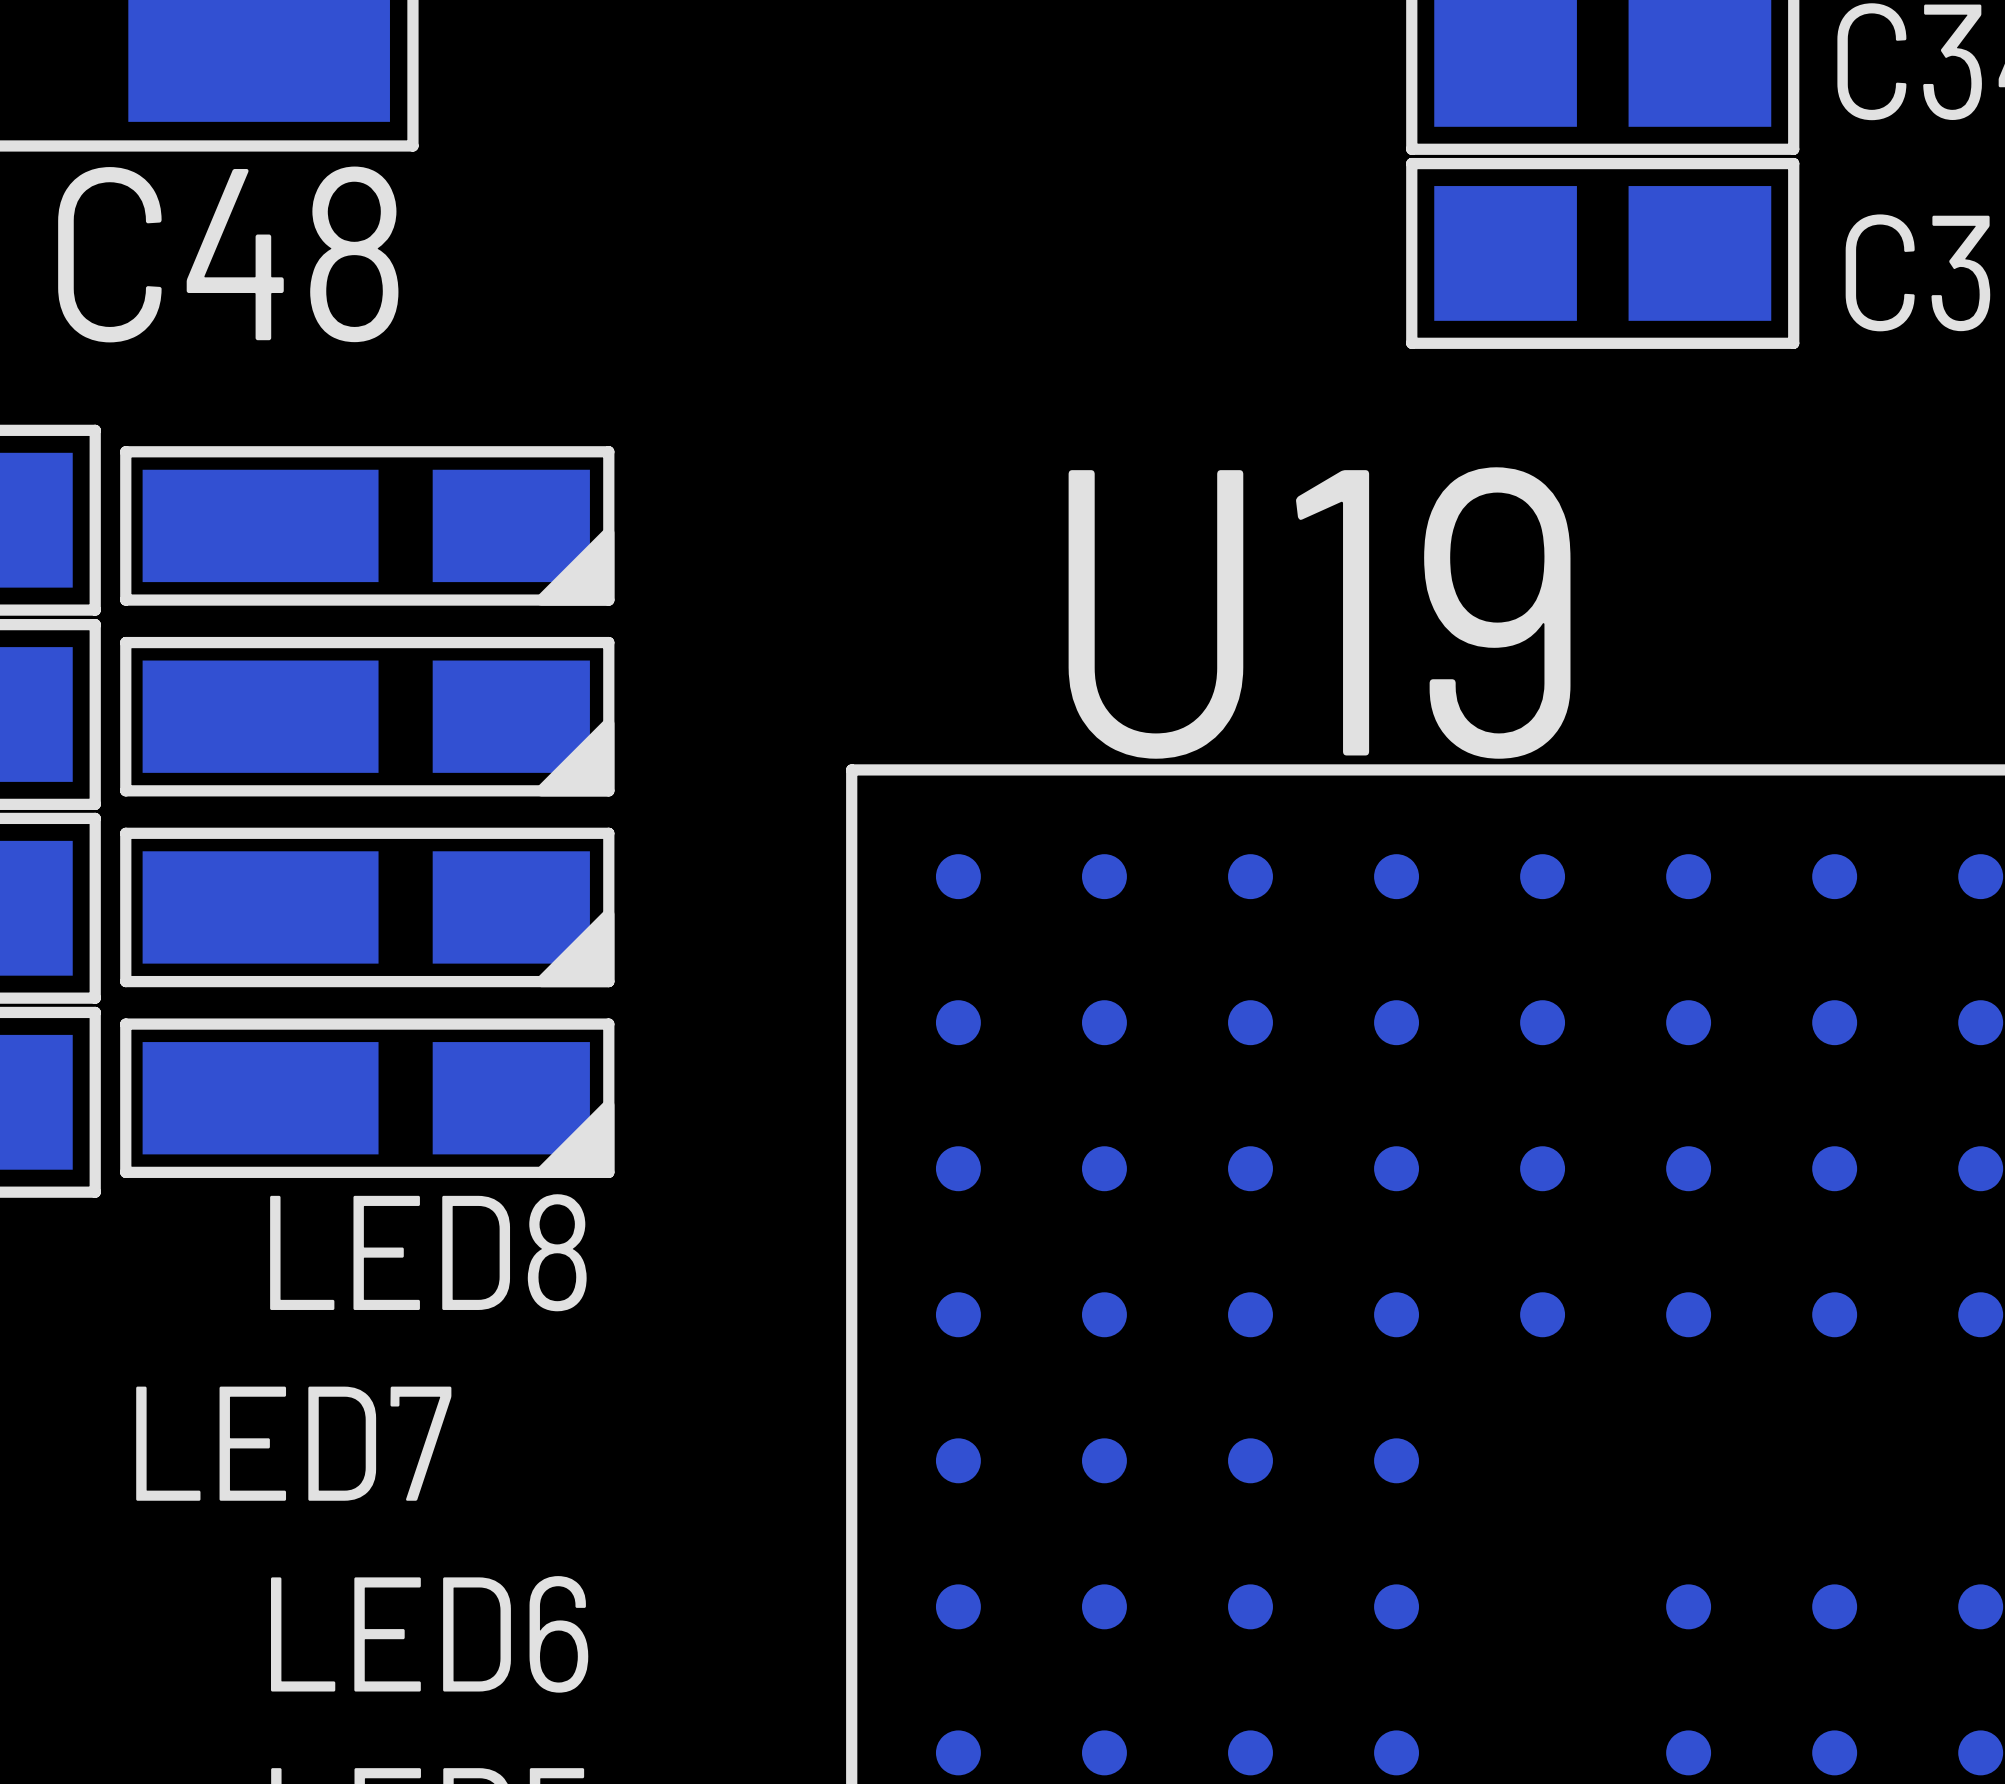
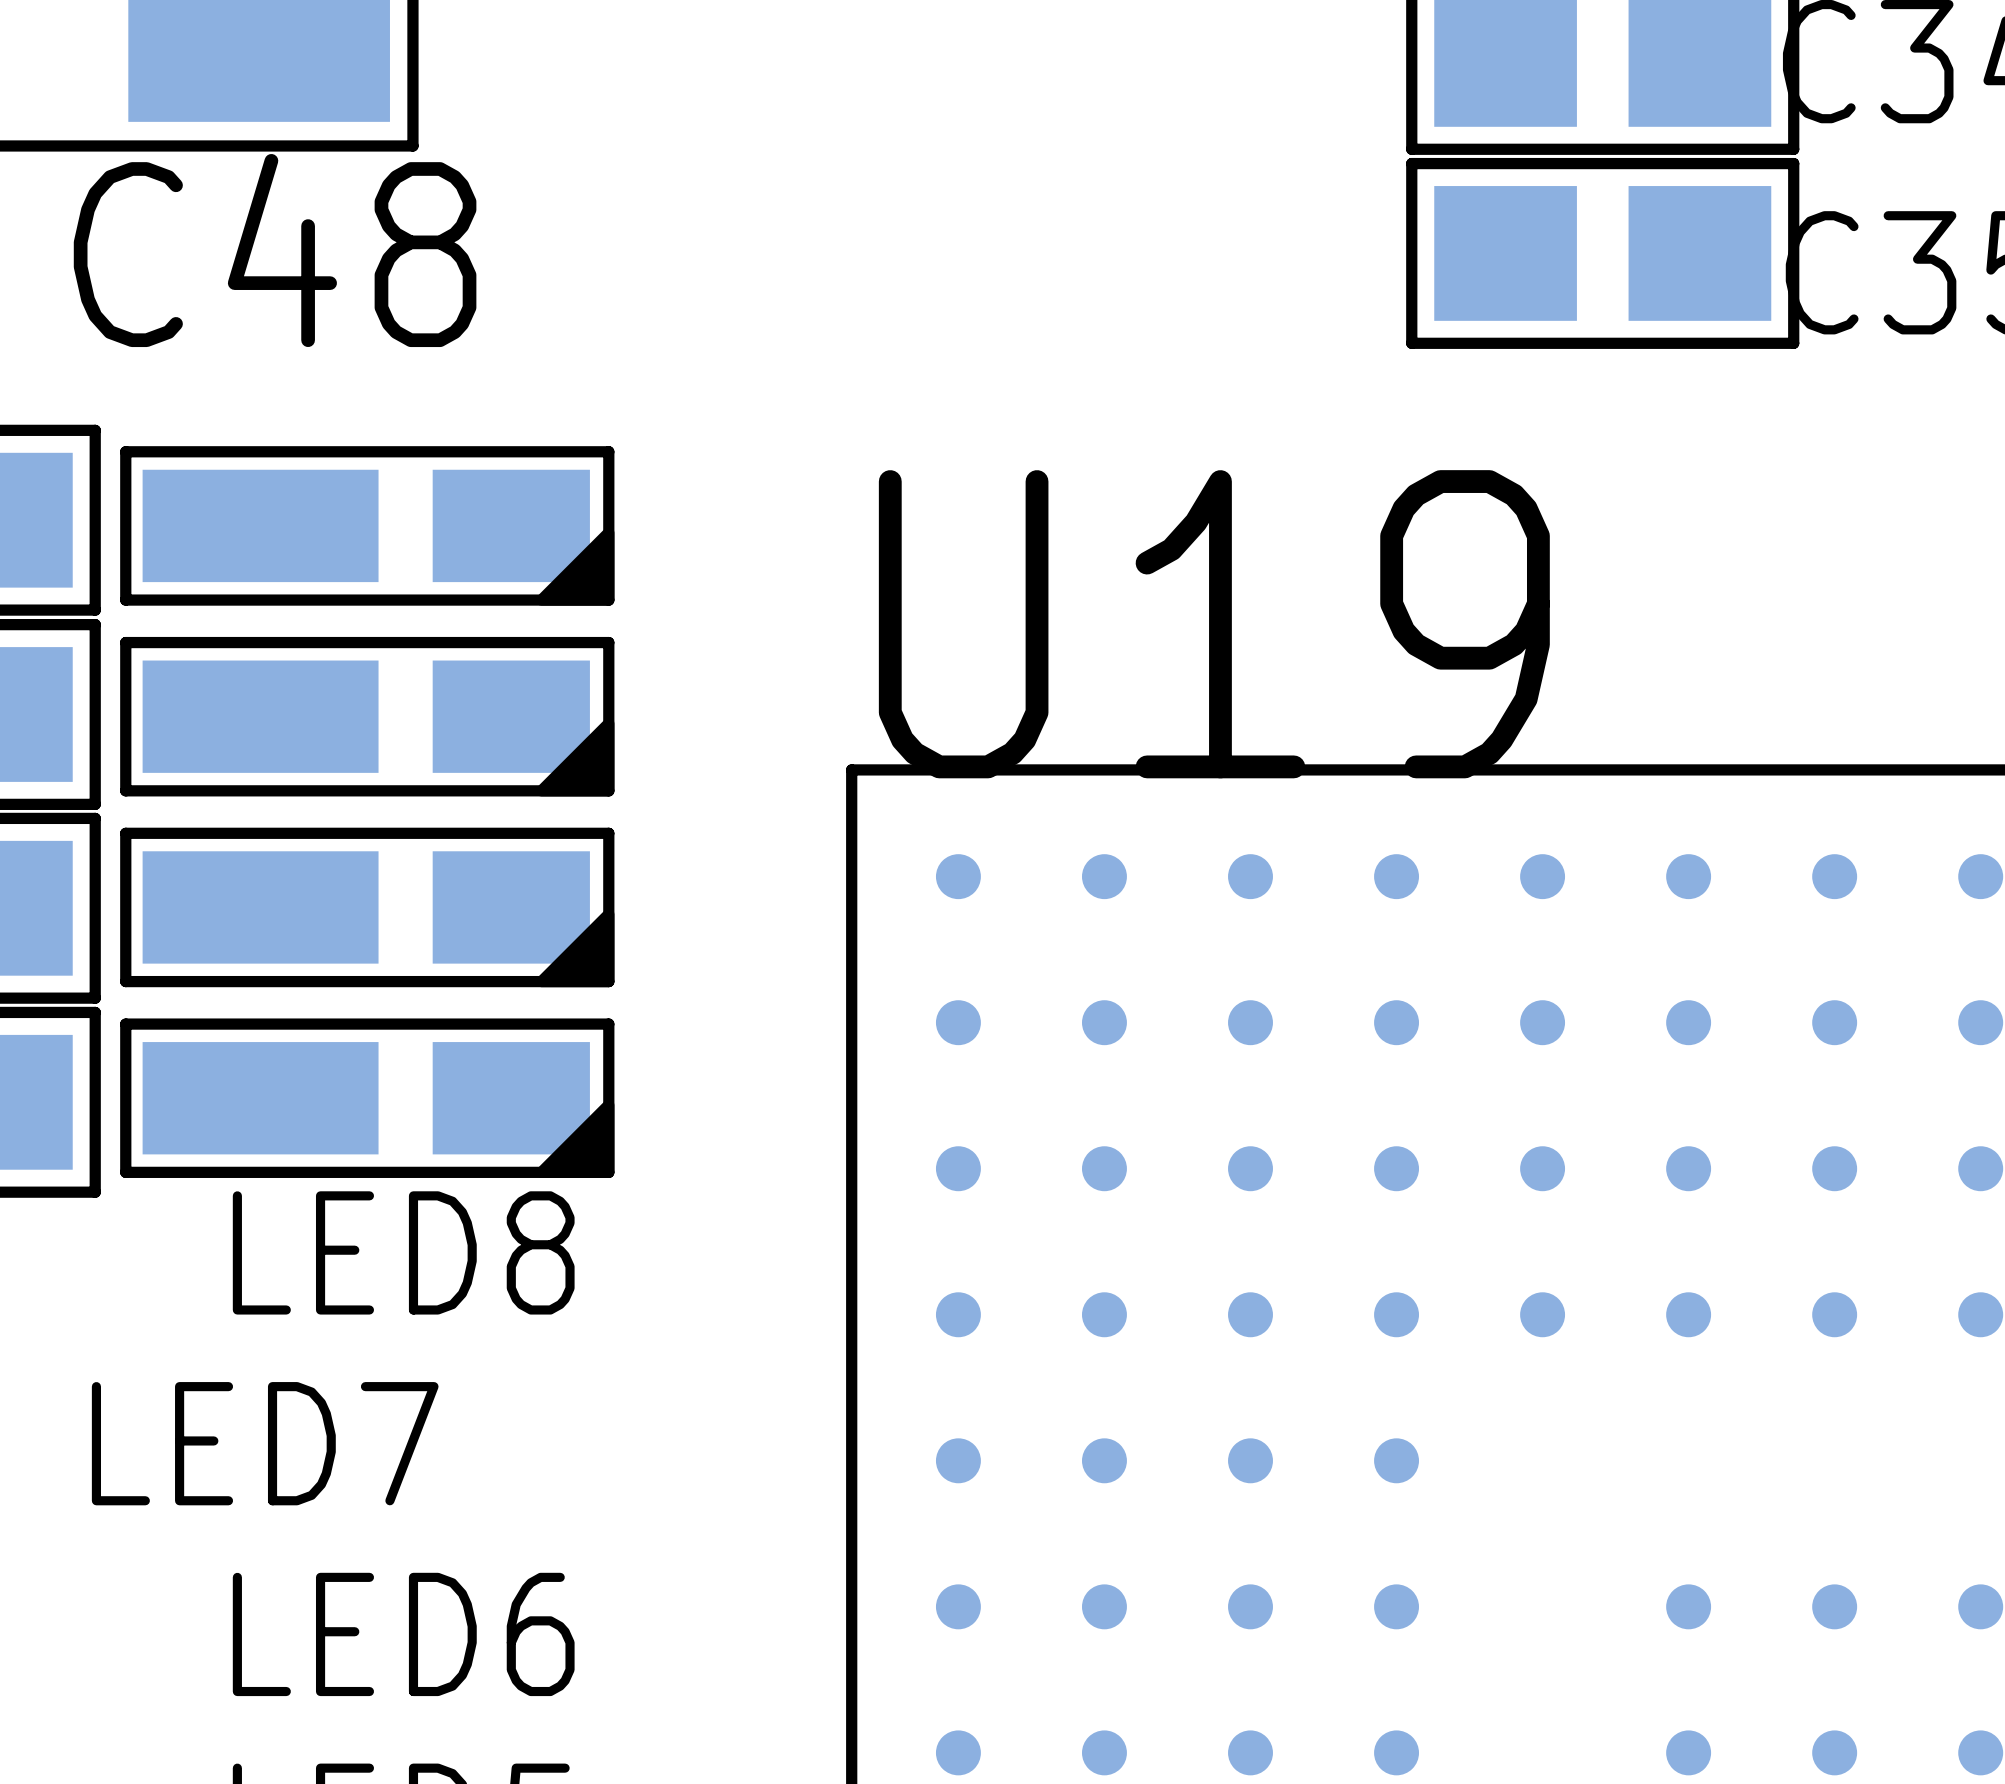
U19 name position: U19 (1319, 613) -> U19 (1214, 624)

